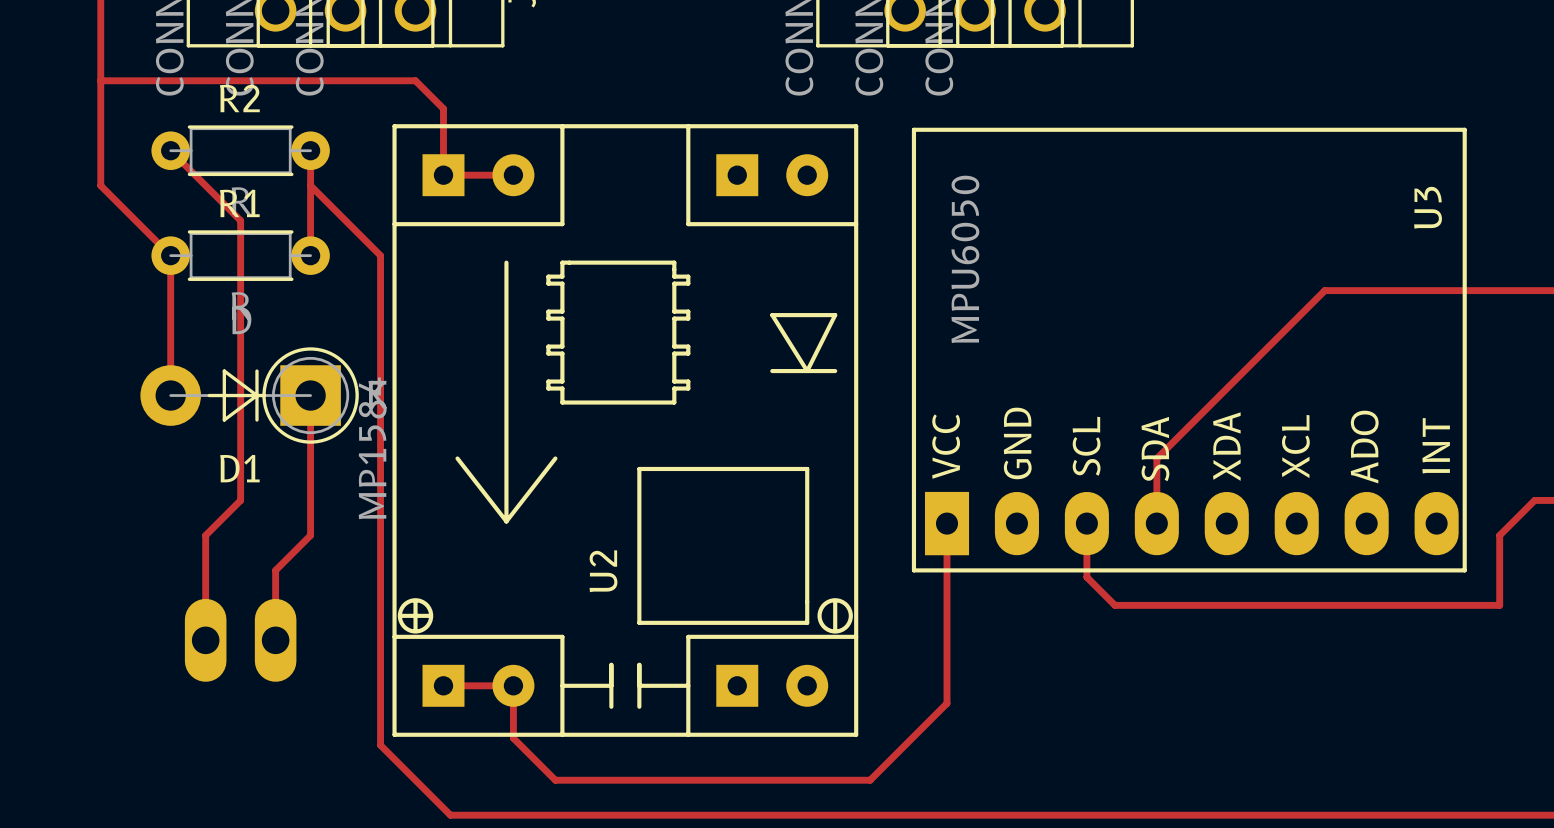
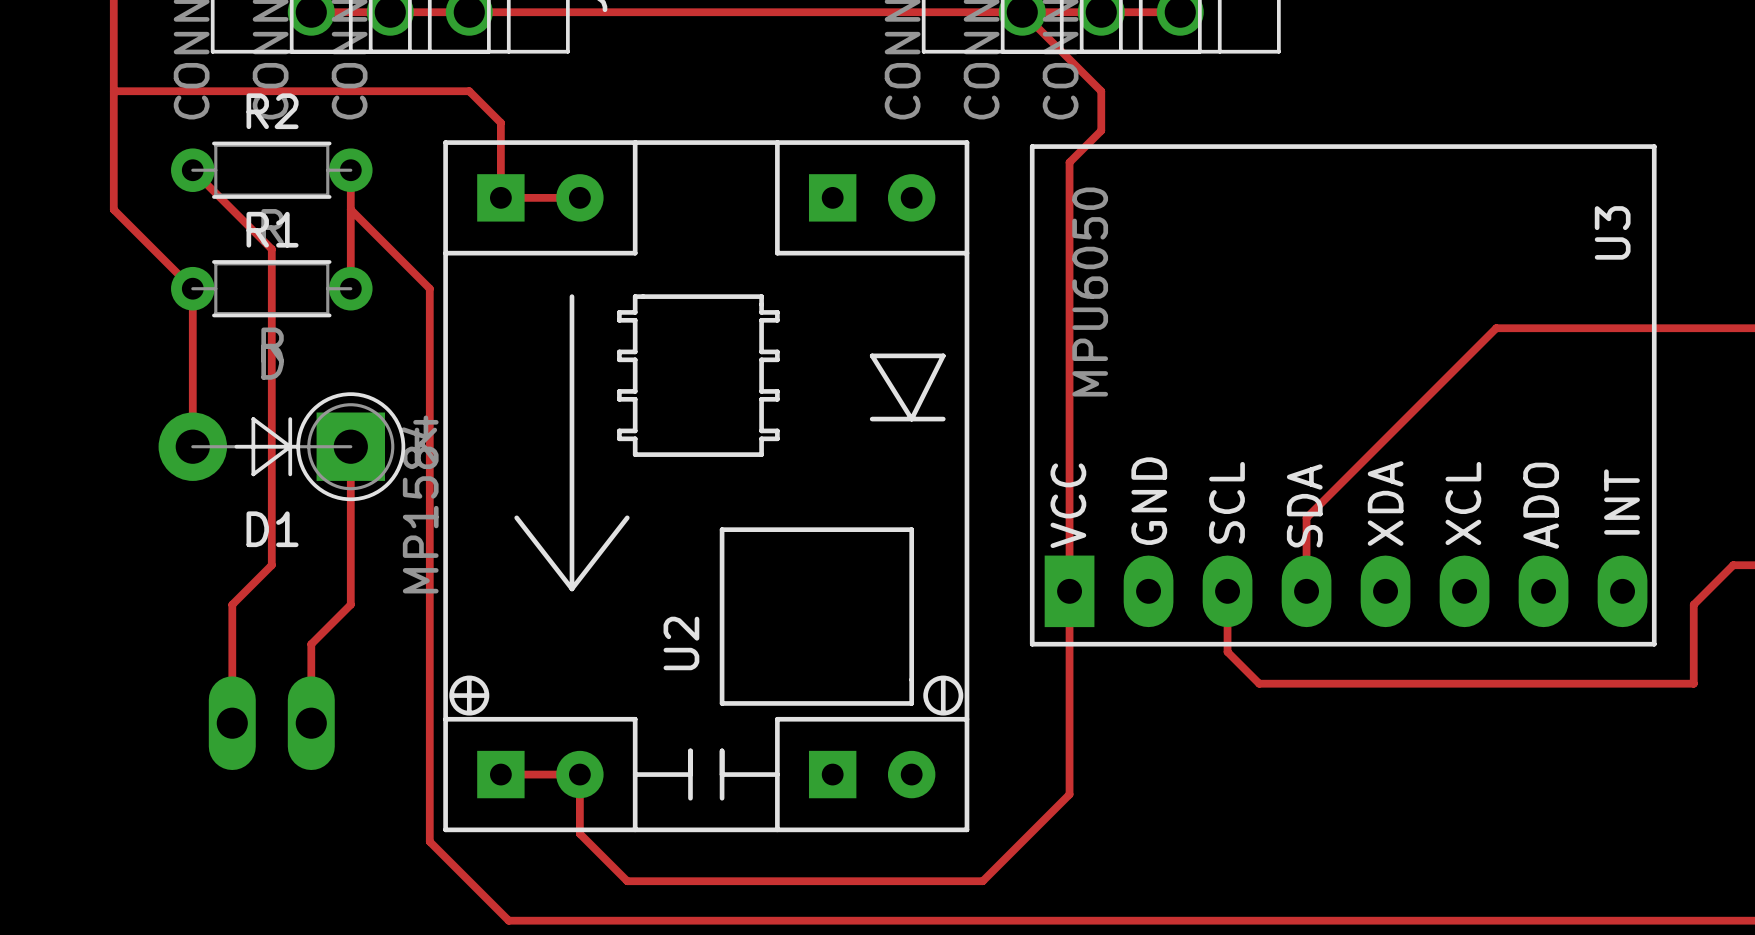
top track: none -> (311, 12) (1180, 12)
top track: none -> (1022, 12) (1101, 91) (1101, 130) (1069, 162) (1069, 591)

